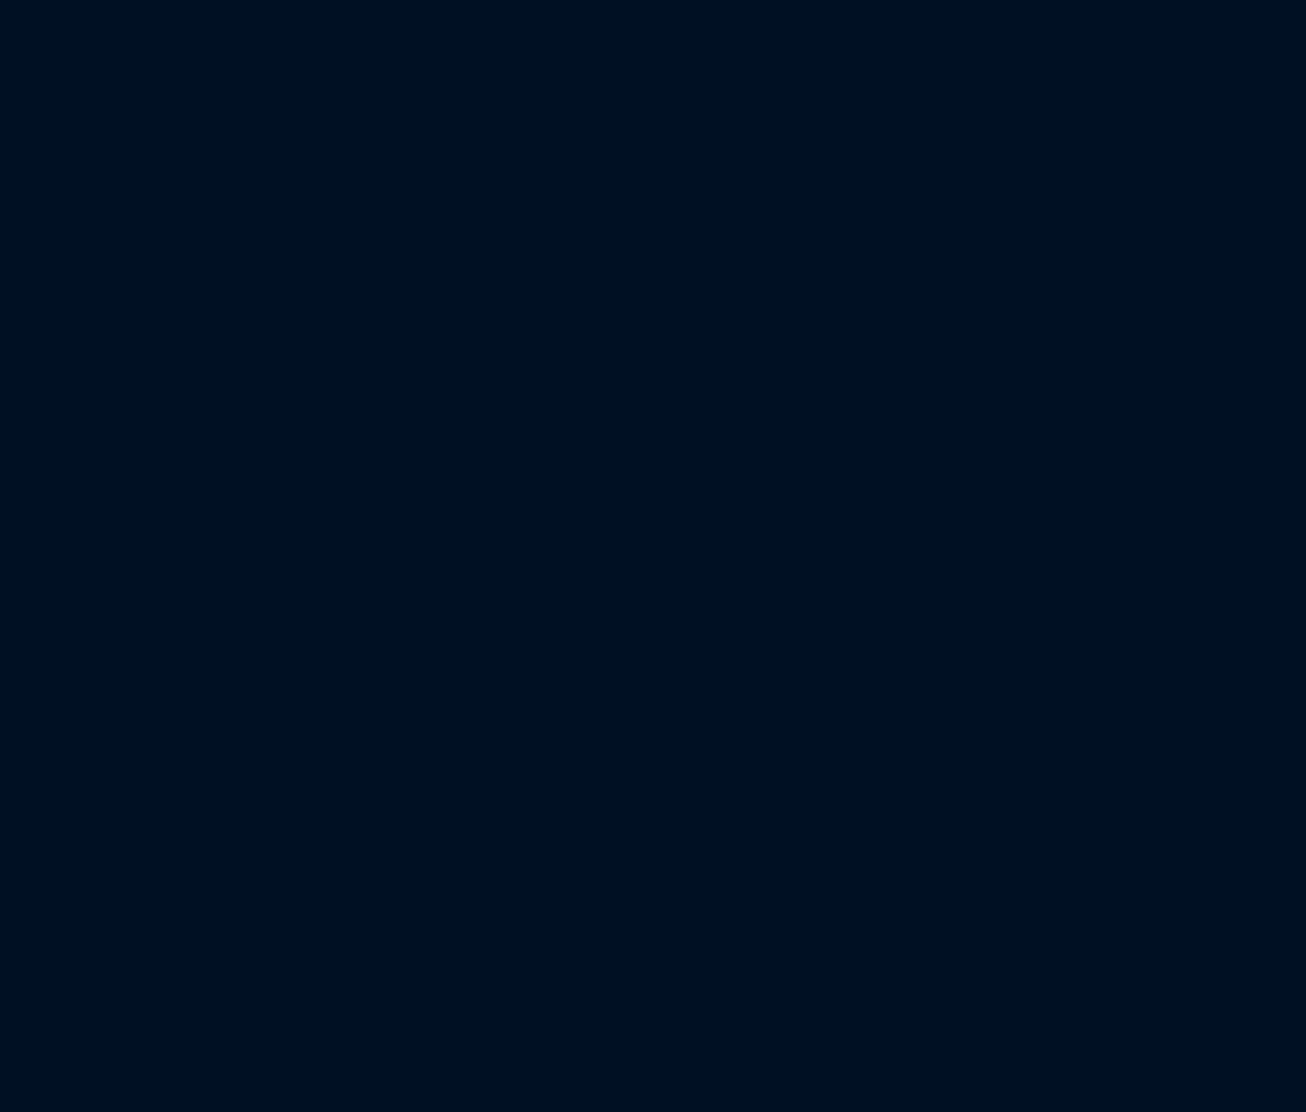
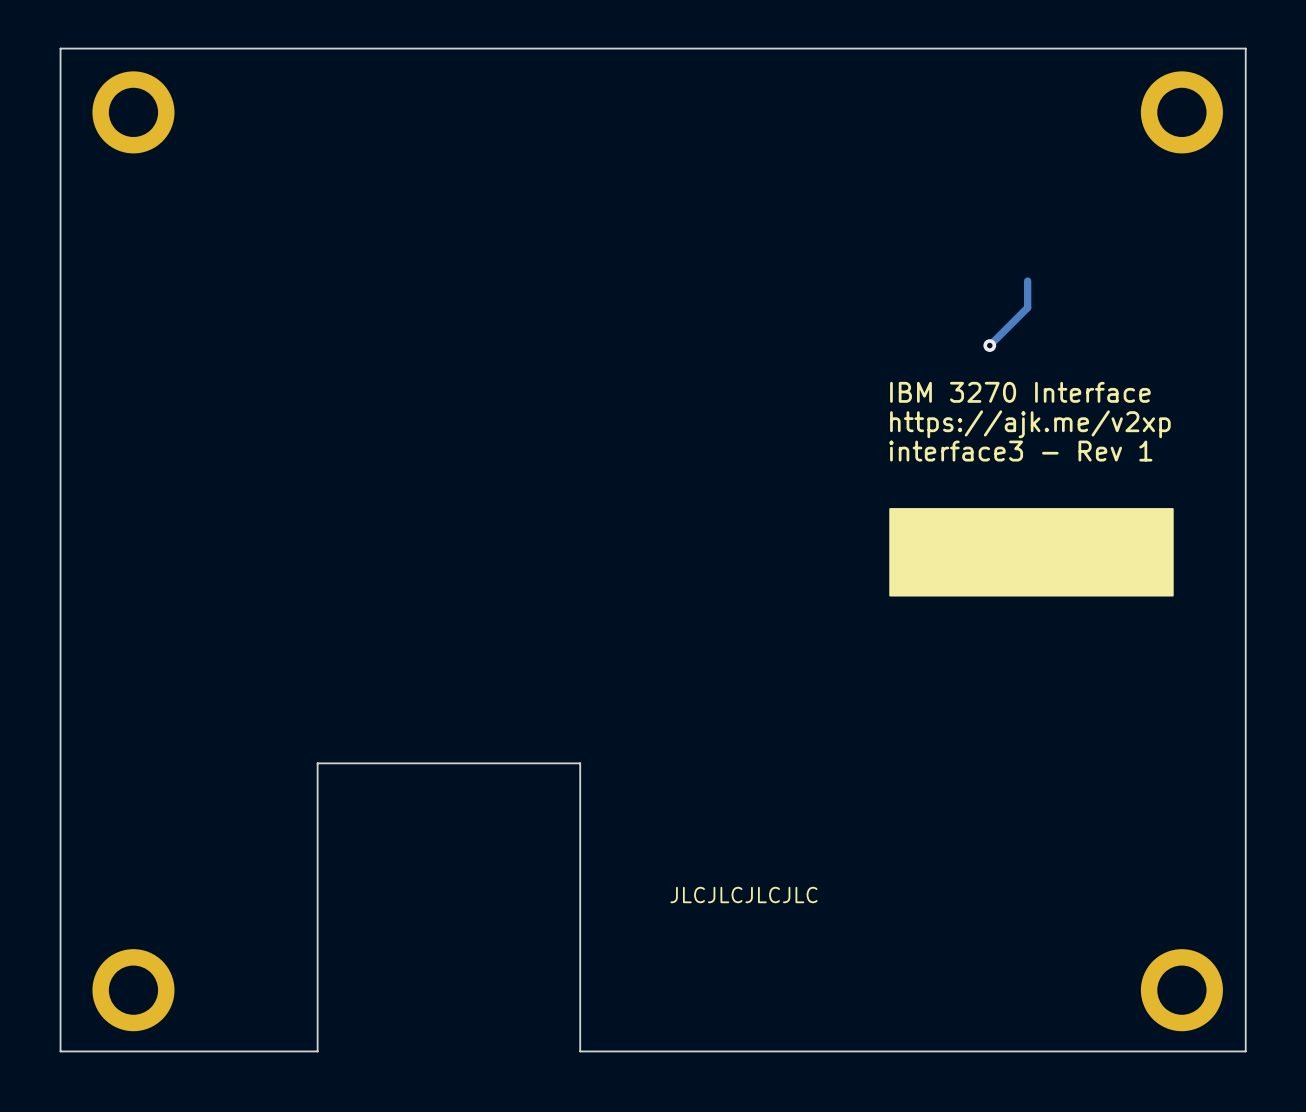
board edge: none -> (1245, 48) (60, 48) (60, 1051) (317, 1051) (317, 763) (580, 763) (580, 1051) (1245, 1051) (1245, 48)
part: none -> (133, 112)
part: none -> (1181, 112)
track: none -> (1027, 281) (1027, 307) (989, 345)
via: none -> (989, 345)
text: none -> IBM 3270 Interface (1020, 392)
text: none -> https://ajk.me/v2xp (1030, 424)
text: none -> interface3 - Rev 1 (1020, 451)
drawing: none -> [889, 508, 1174, 597]
text: none -> JLCJLCJLCJLC (743, 895)
part: none -> (133, 990)
part: none -> (1181, 990)

